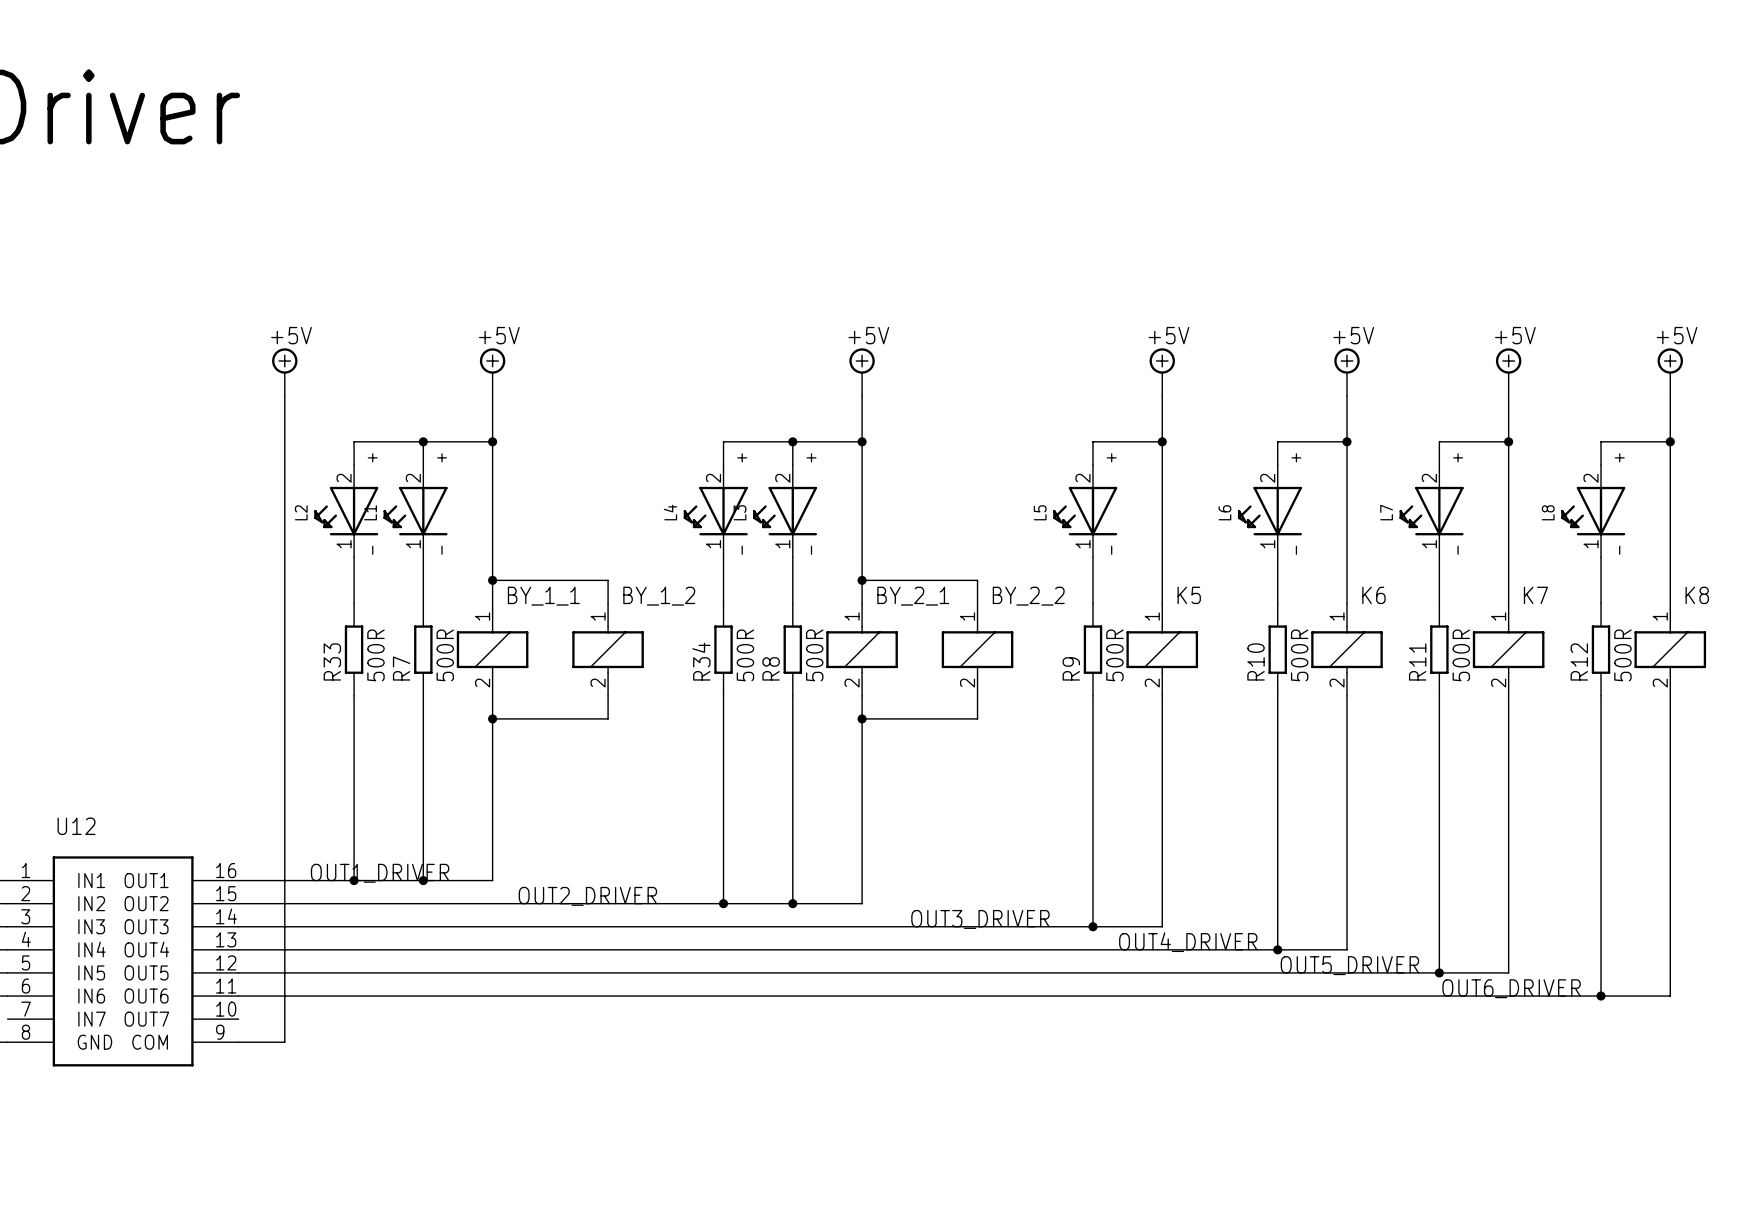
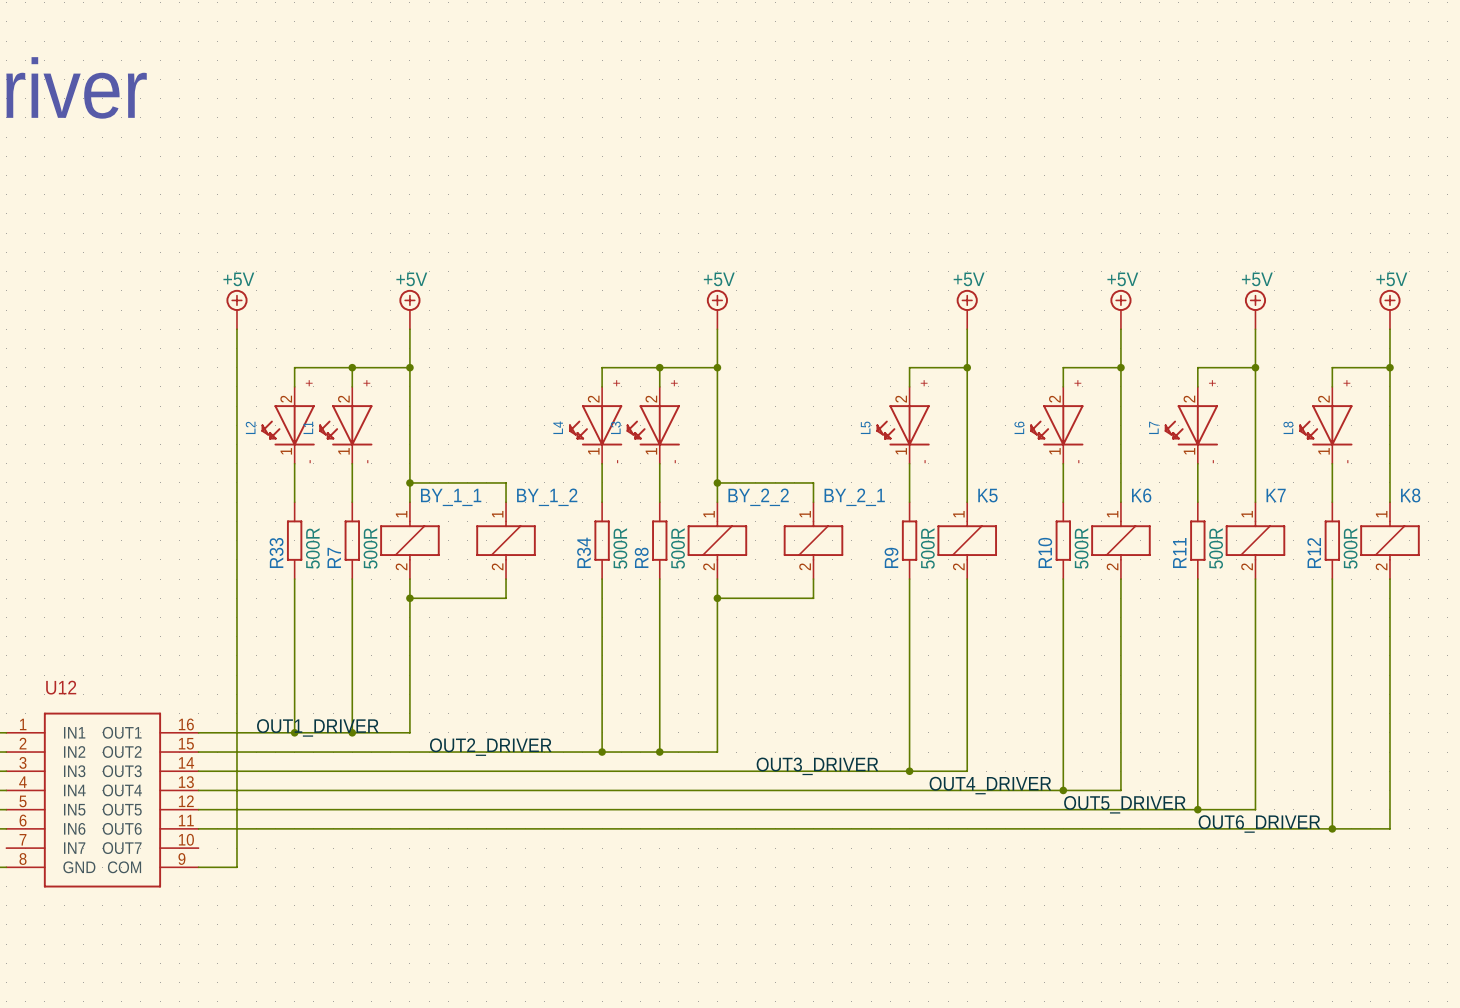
BY_2_1 name: BY_2_1 (913, 596) -> BY_2_2 (758, 497)
BY_2_2 name: BY_2_2 (1028, 596) -> BY_2_1 (854, 497)

